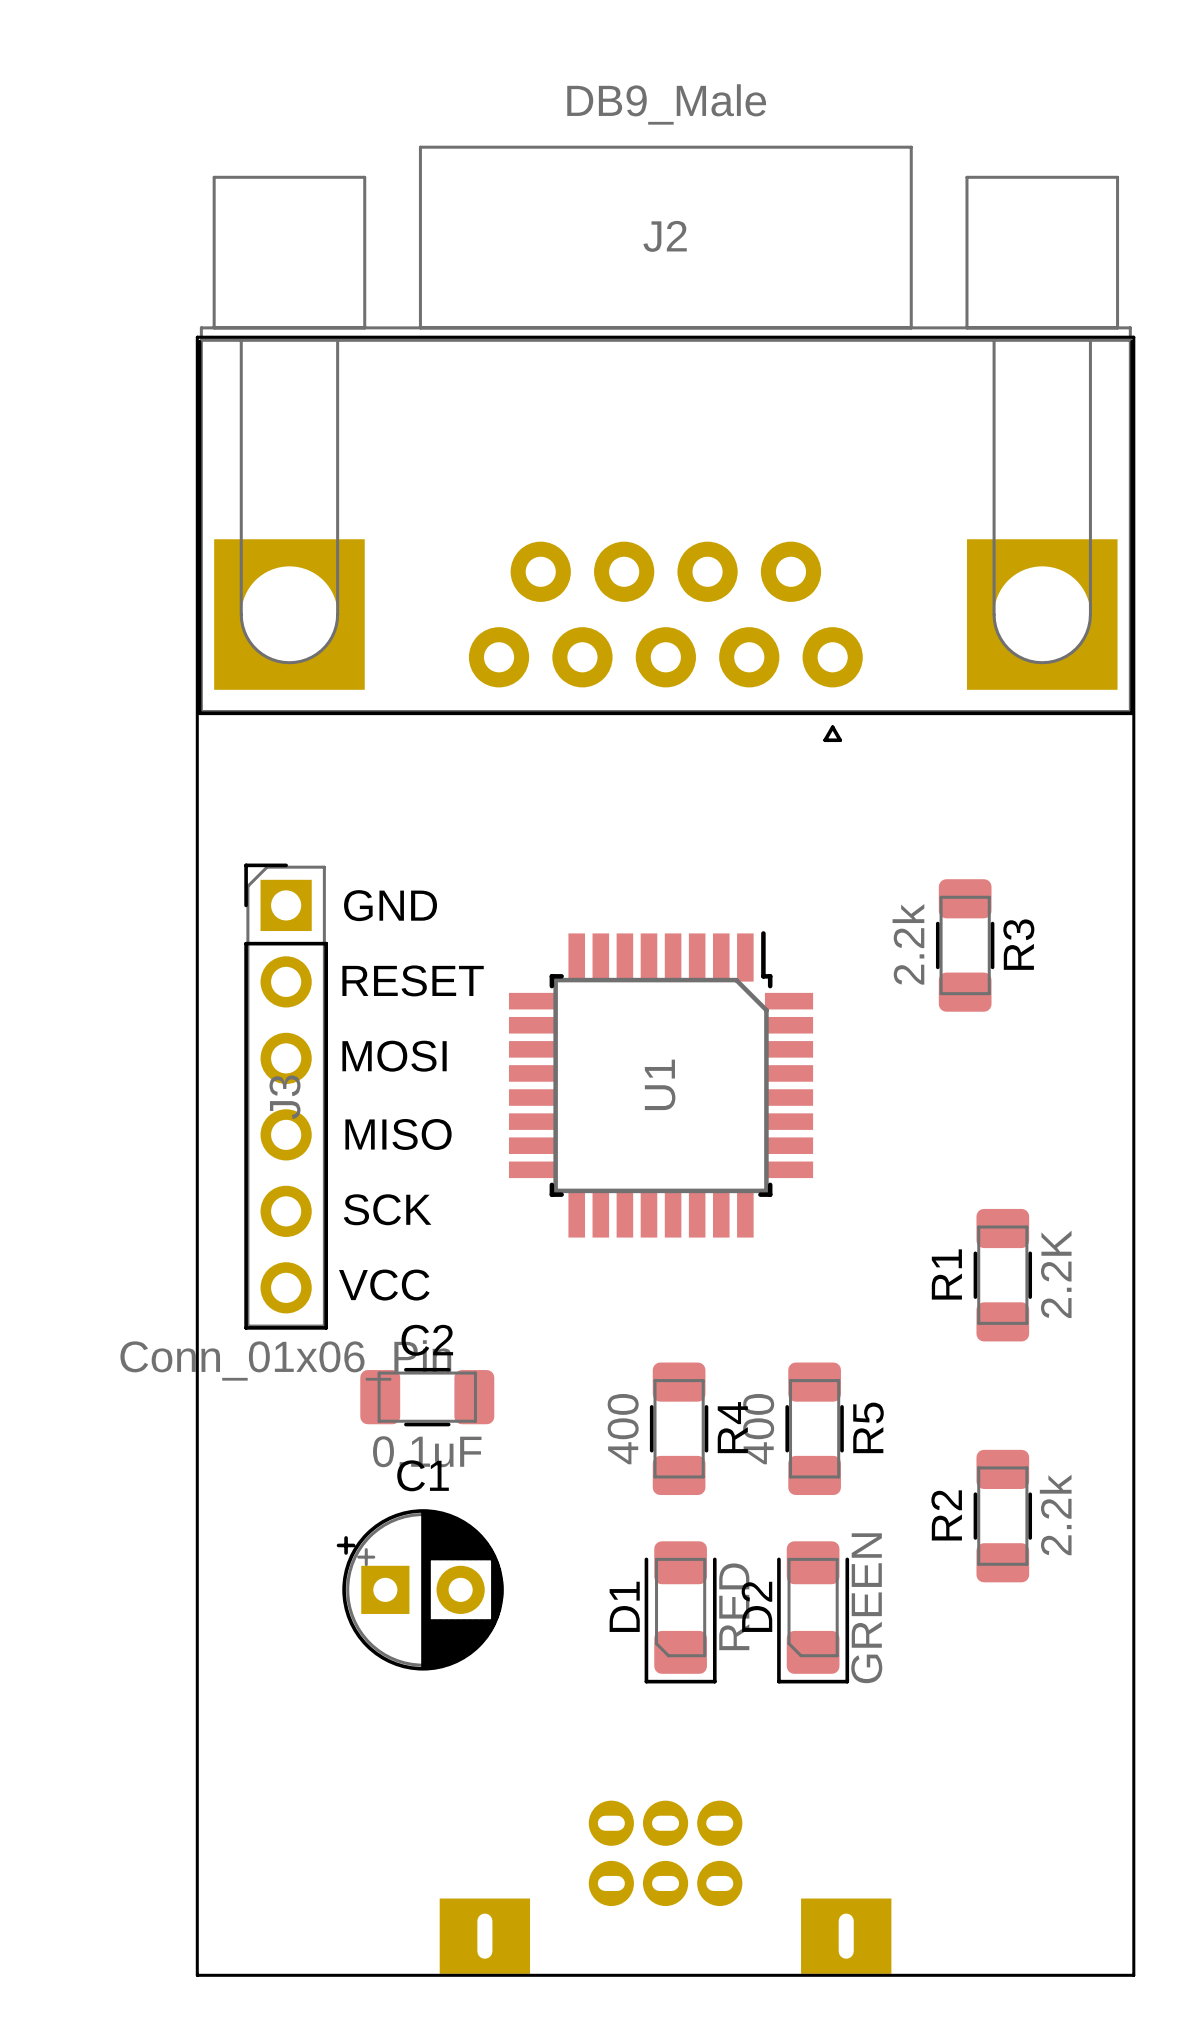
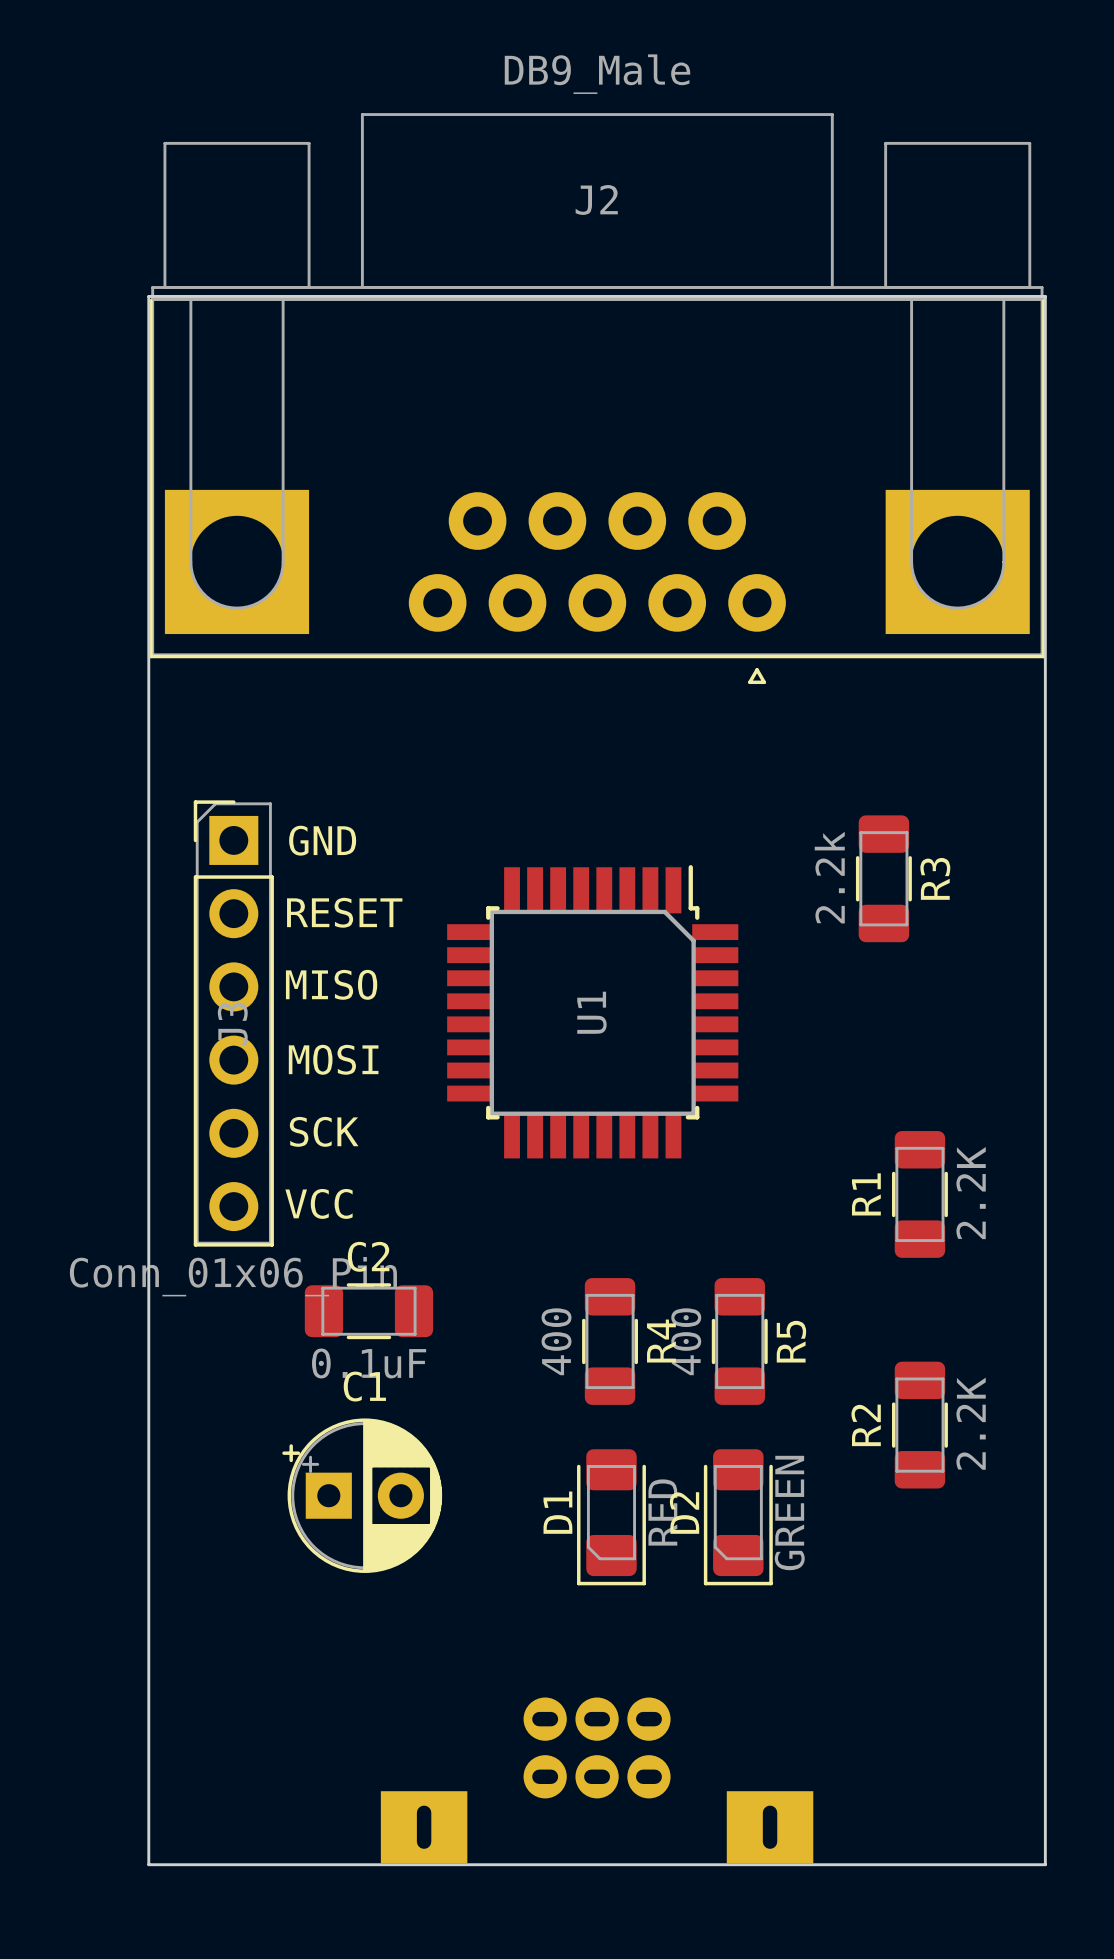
text: MOSI (394, 1056) -> MISO (331, 984)
text: MISO (398, 1134) -> MOSI (333, 1059)
R2 value: 2.2k (1055, 1514) -> 2.2K (971, 1423)

